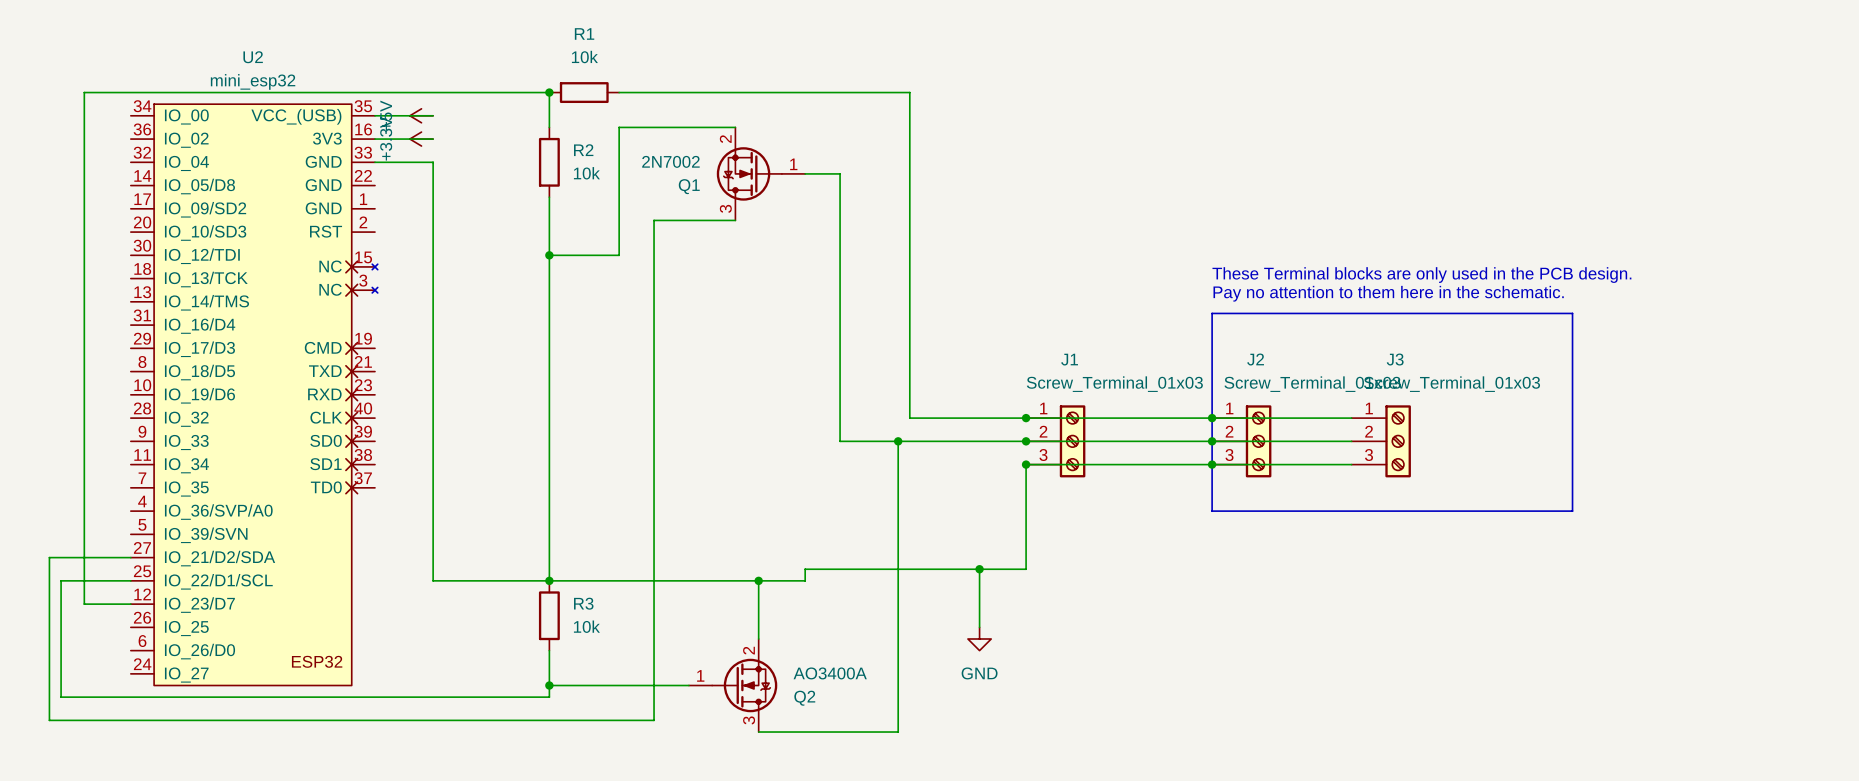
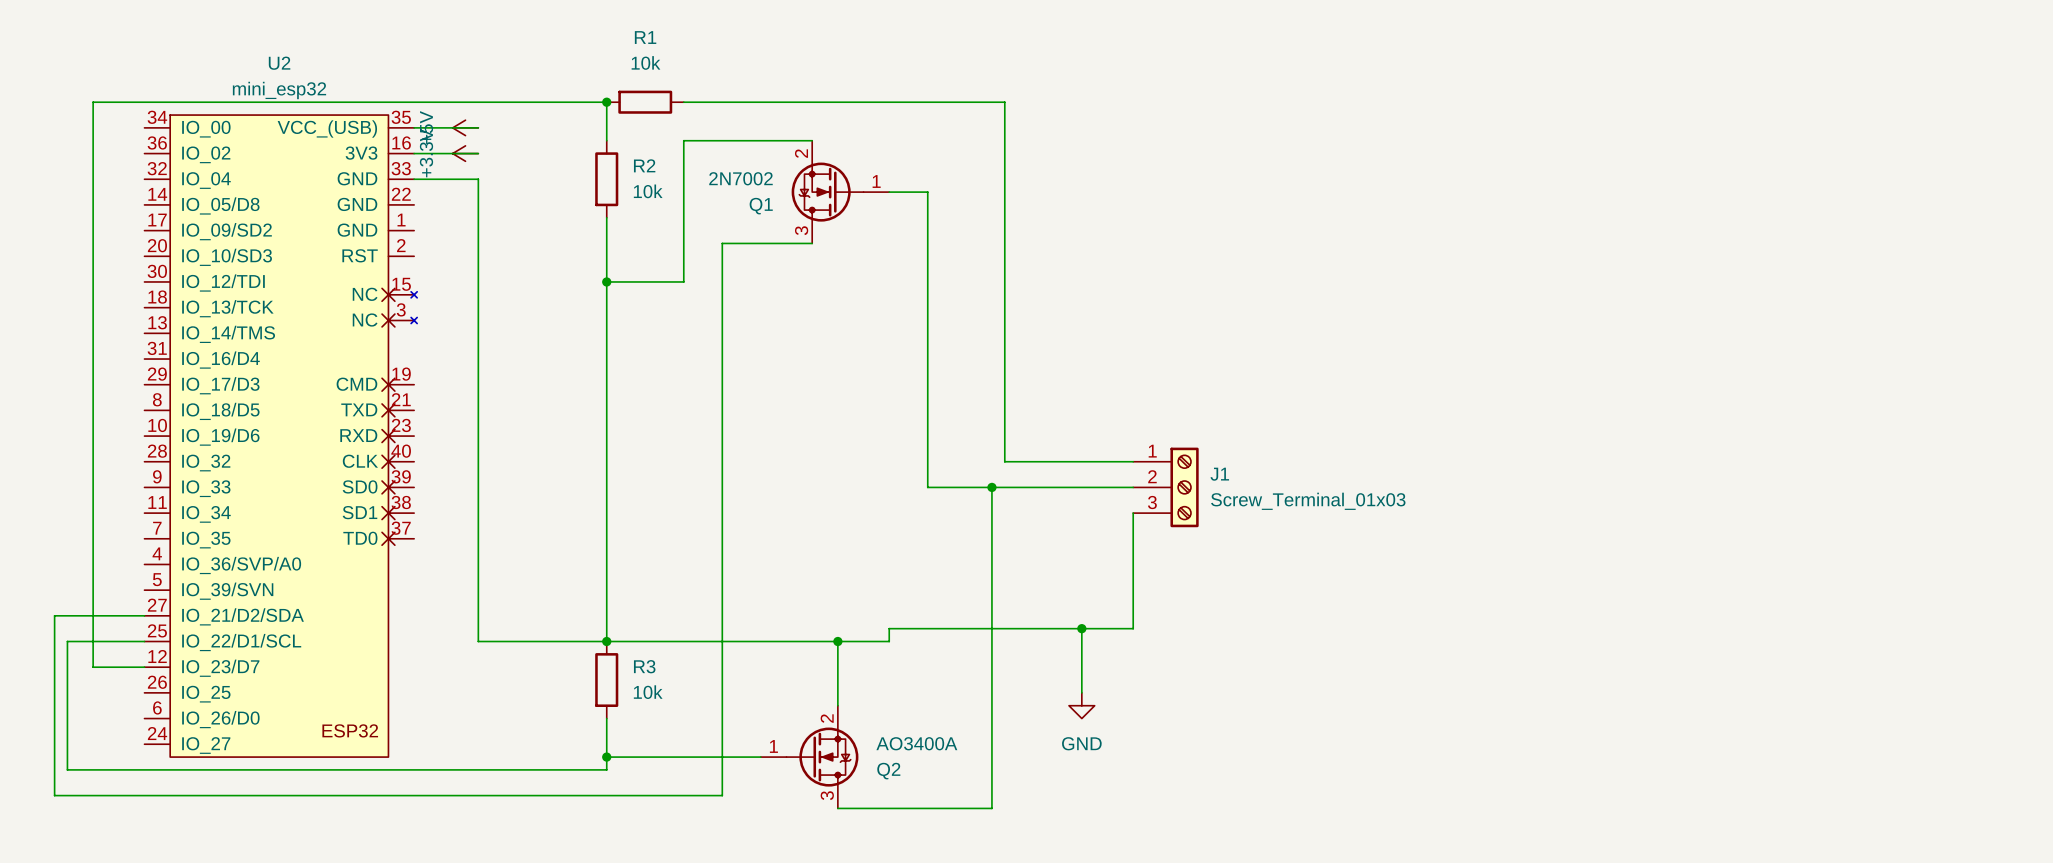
text: These Terminal blocks are only used in the PCB design. (1421, 275) -> none
text: Pay no attention to them here in the schematic. (1388, 293) -> none
line: (1212, 313) (1572, 313) (1572, 511) (1212, 511) (1212, 313) -> none
J1 name position: J1 (1069, 359) -> J1 (1219, 474)
J1 value position: Screw_Terminal_01x03 (1114, 384) -> Screw_Terminal_01x03 (1308, 501)
wire: (1026, 418) (1351, 418) -> none
junction: (1026, 418) -> none
junction: (1212, 418) -> none
wire: (1026, 441) (1351, 441) -> none
junction: (1026, 441) -> none
junction: (1212, 441) -> none
J2: Screw_Terminal_01x03 (1241, 441) -> none
J3: Screw_Terminal_01x03 (1381, 441) -> none
wire: (1026, 464) (1351, 464) -> none
junction: (1026, 464) -> none
junction: (1212, 464) -> none

